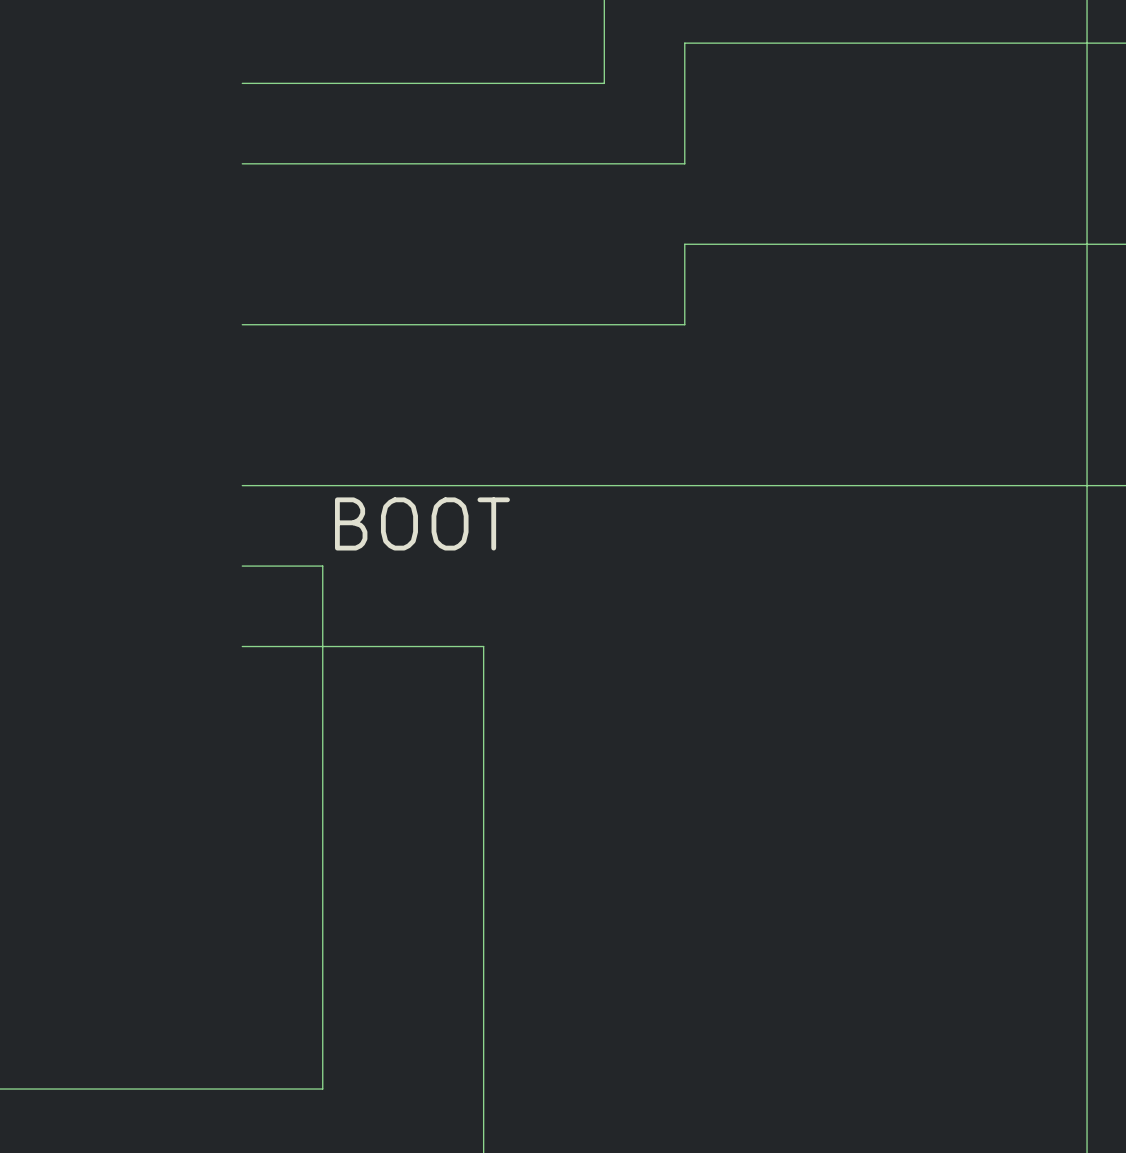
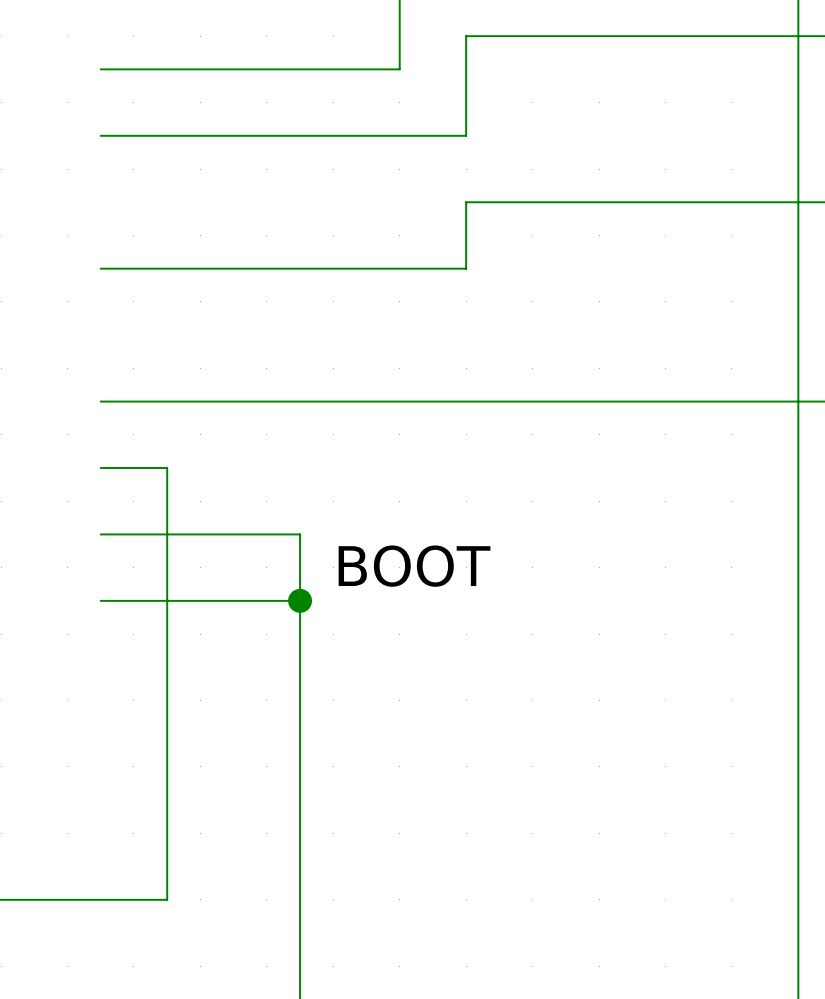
label position: BOOT (422, 523) -> BOOT (414, 566)
wire: none -> (100, 600) (300, 600)
junction: none -> (300, 600)

